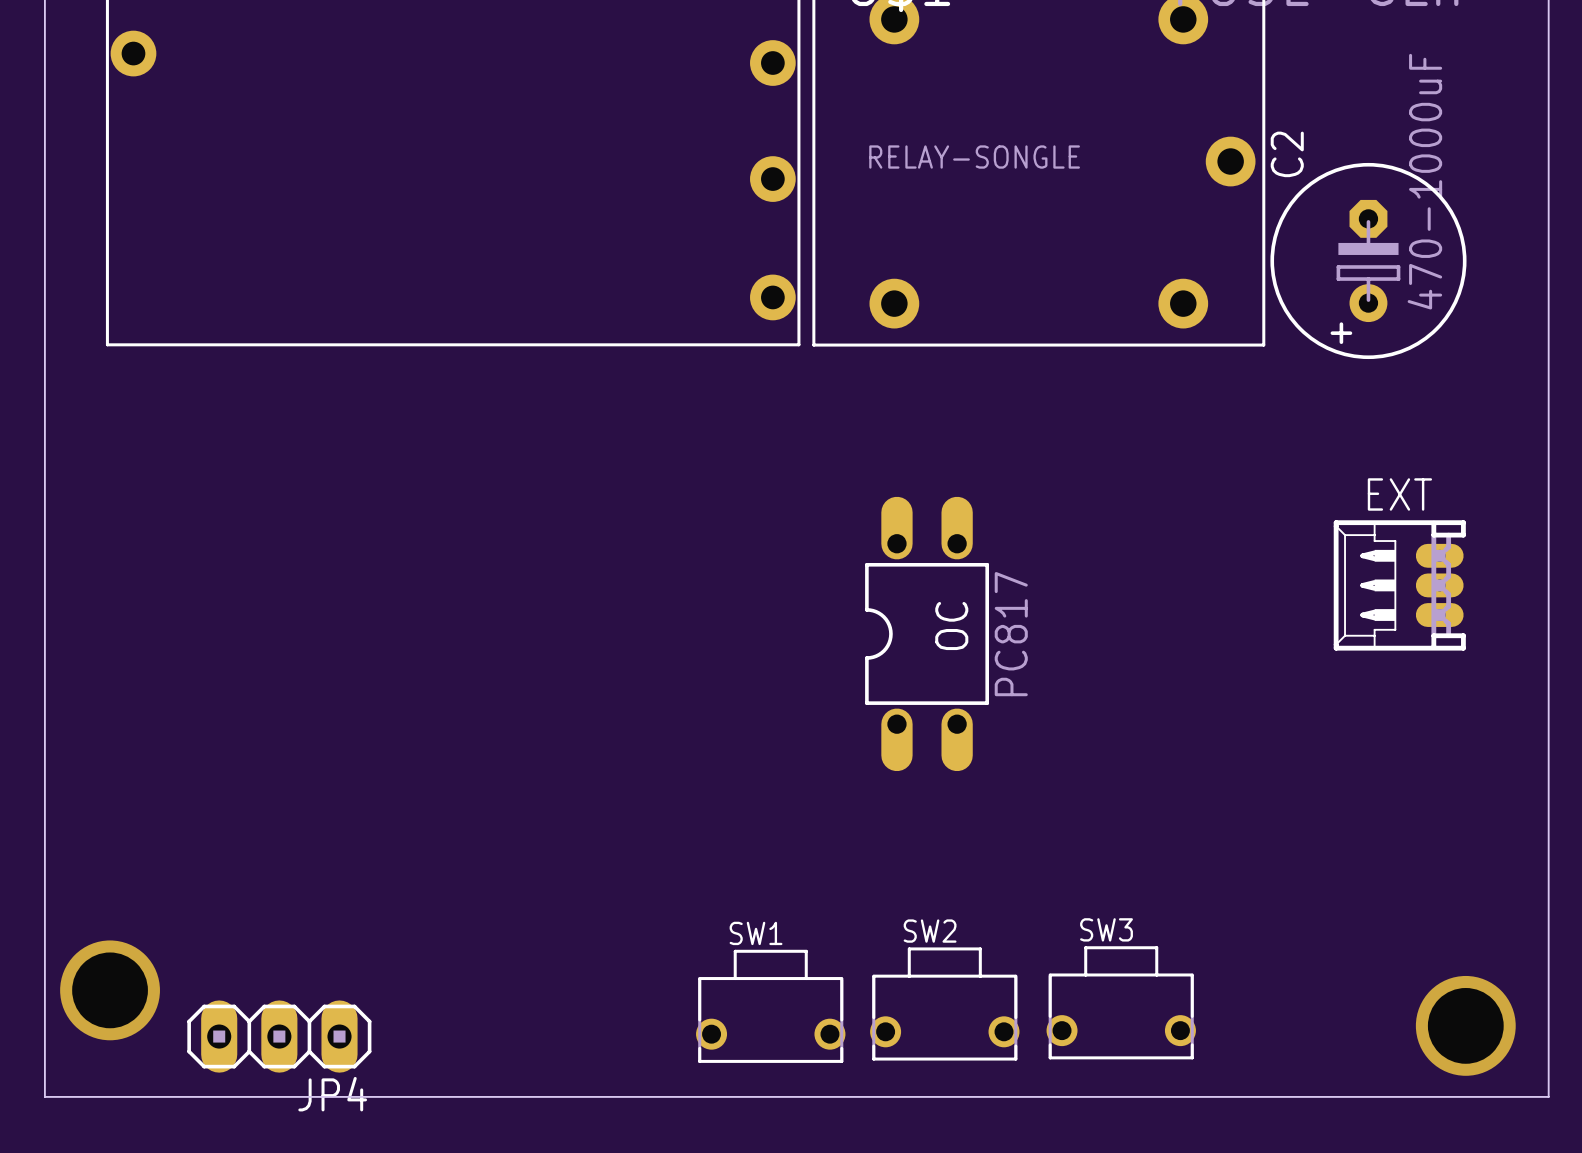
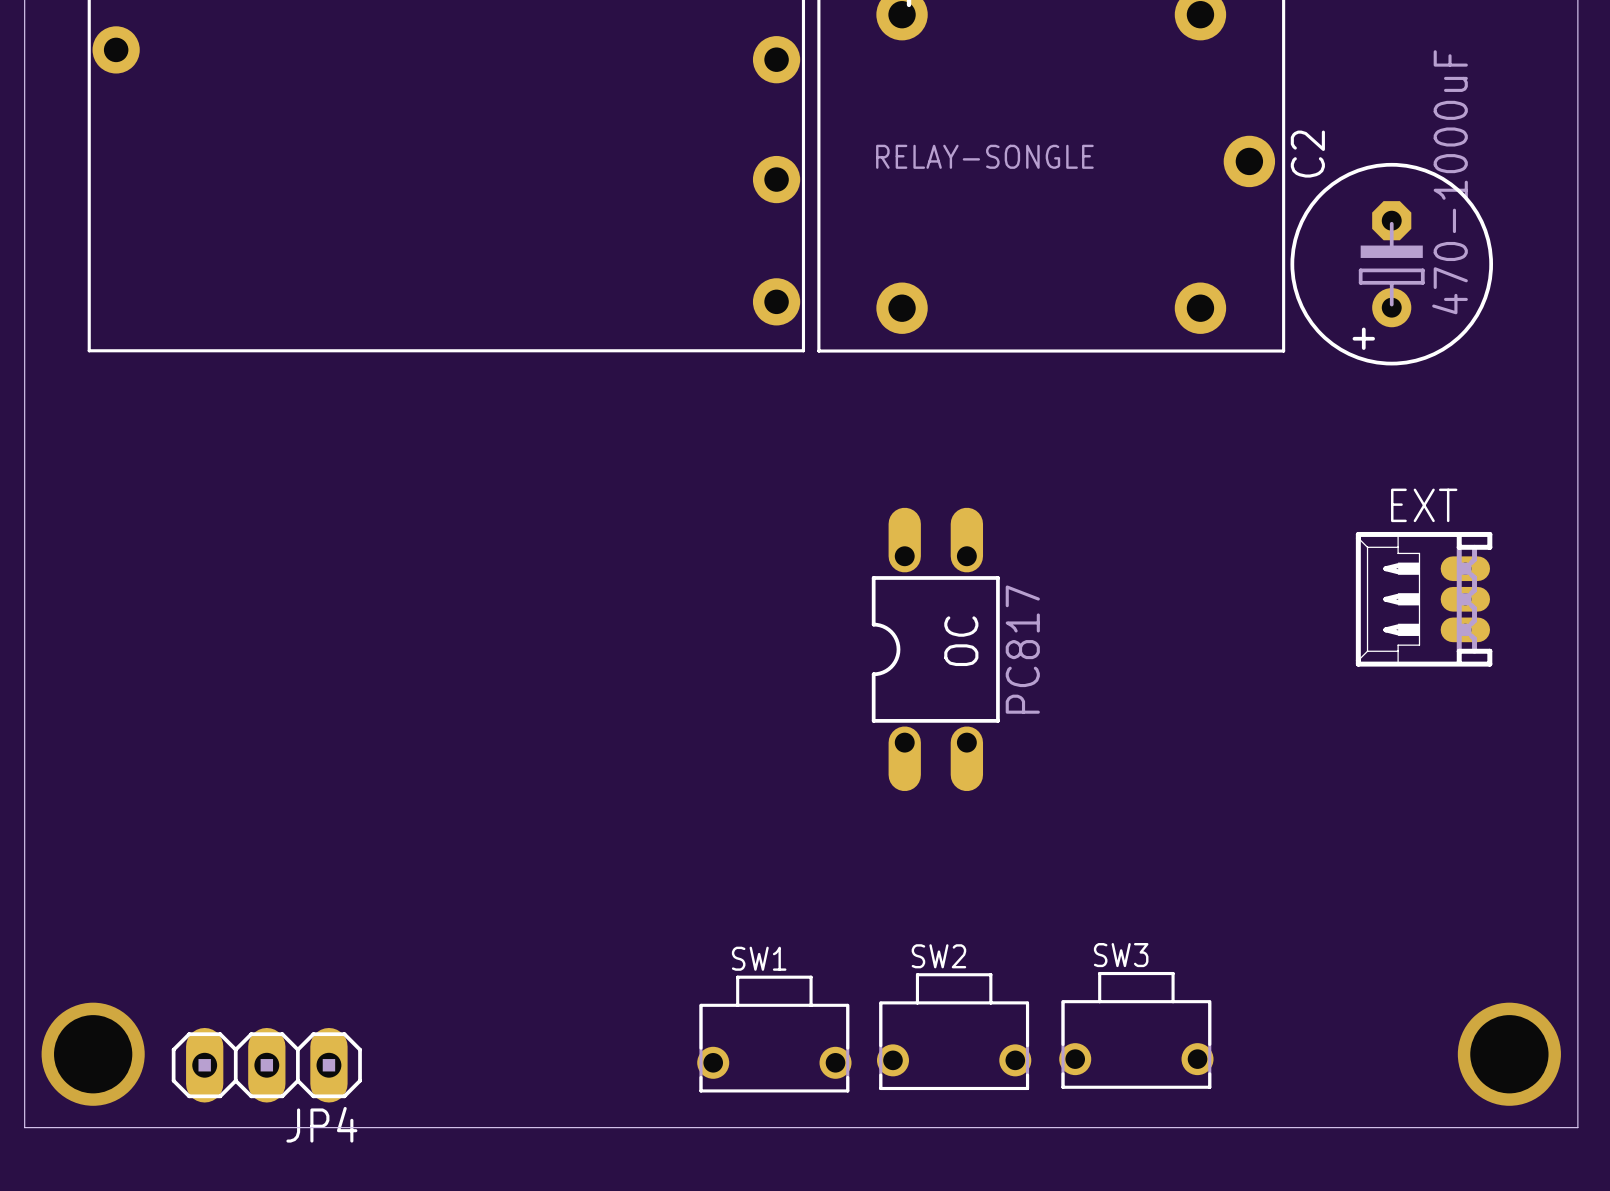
via position: (110, 990) -> (93, 1054)
via position: (1465, 1025) -> (1509, 1054)

